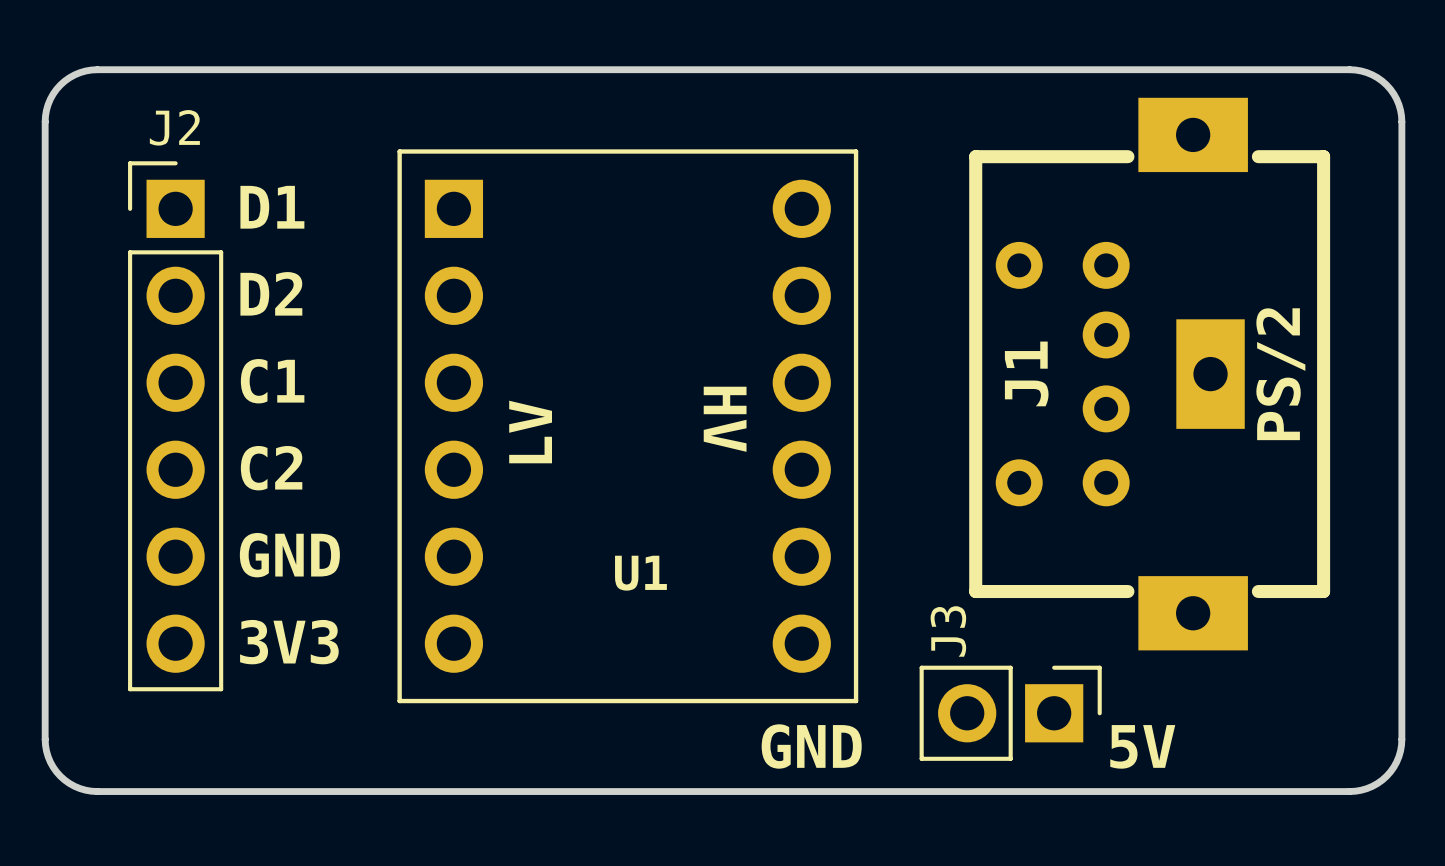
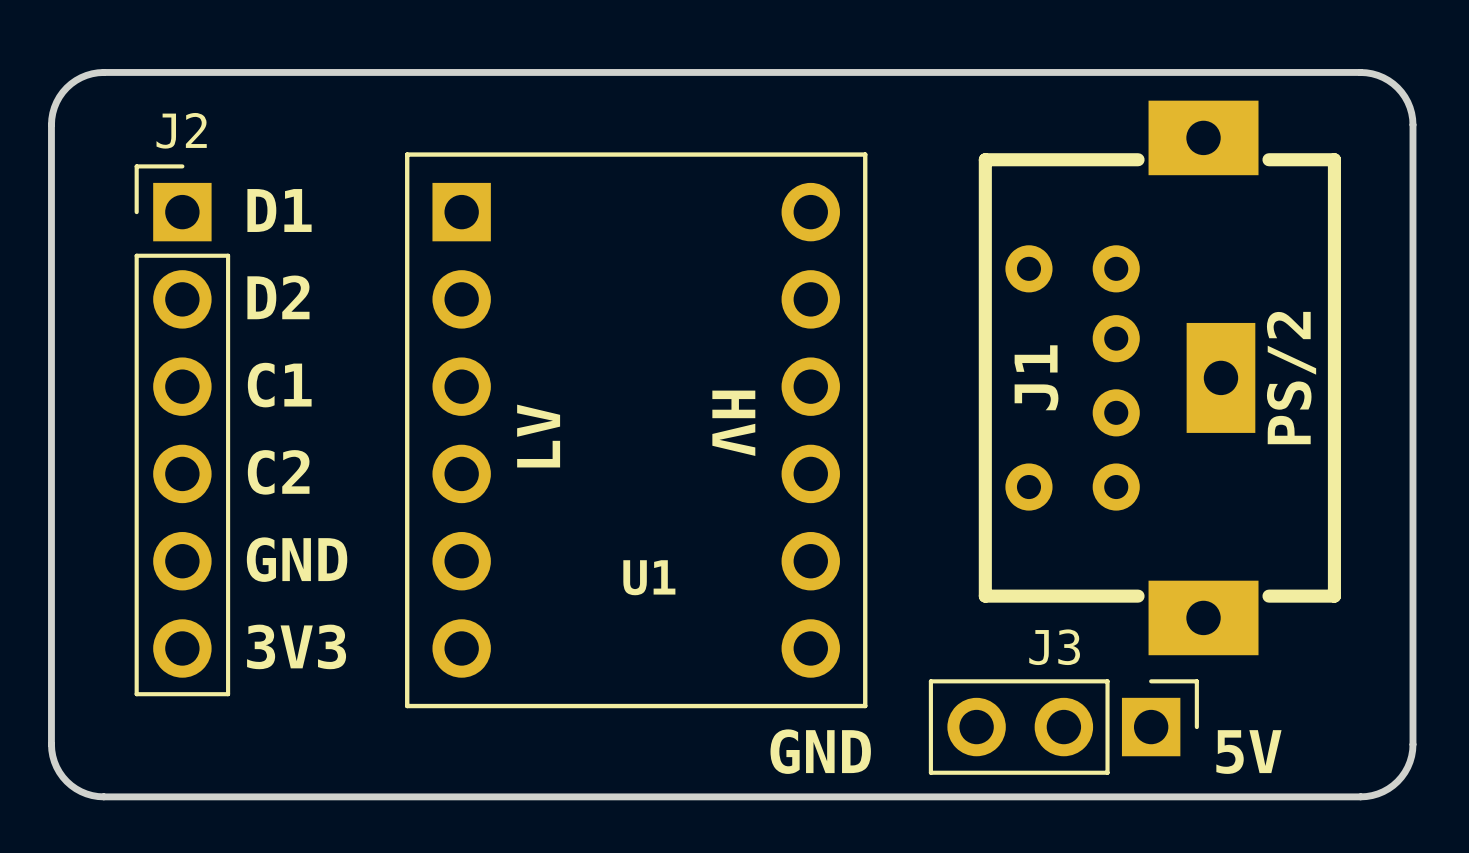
J3 footprint: [919, 665, 1102, 761] -> [928, 679, 1199, 775]
text position: 5V (1142, 746) -> 5V (1248, 752)

